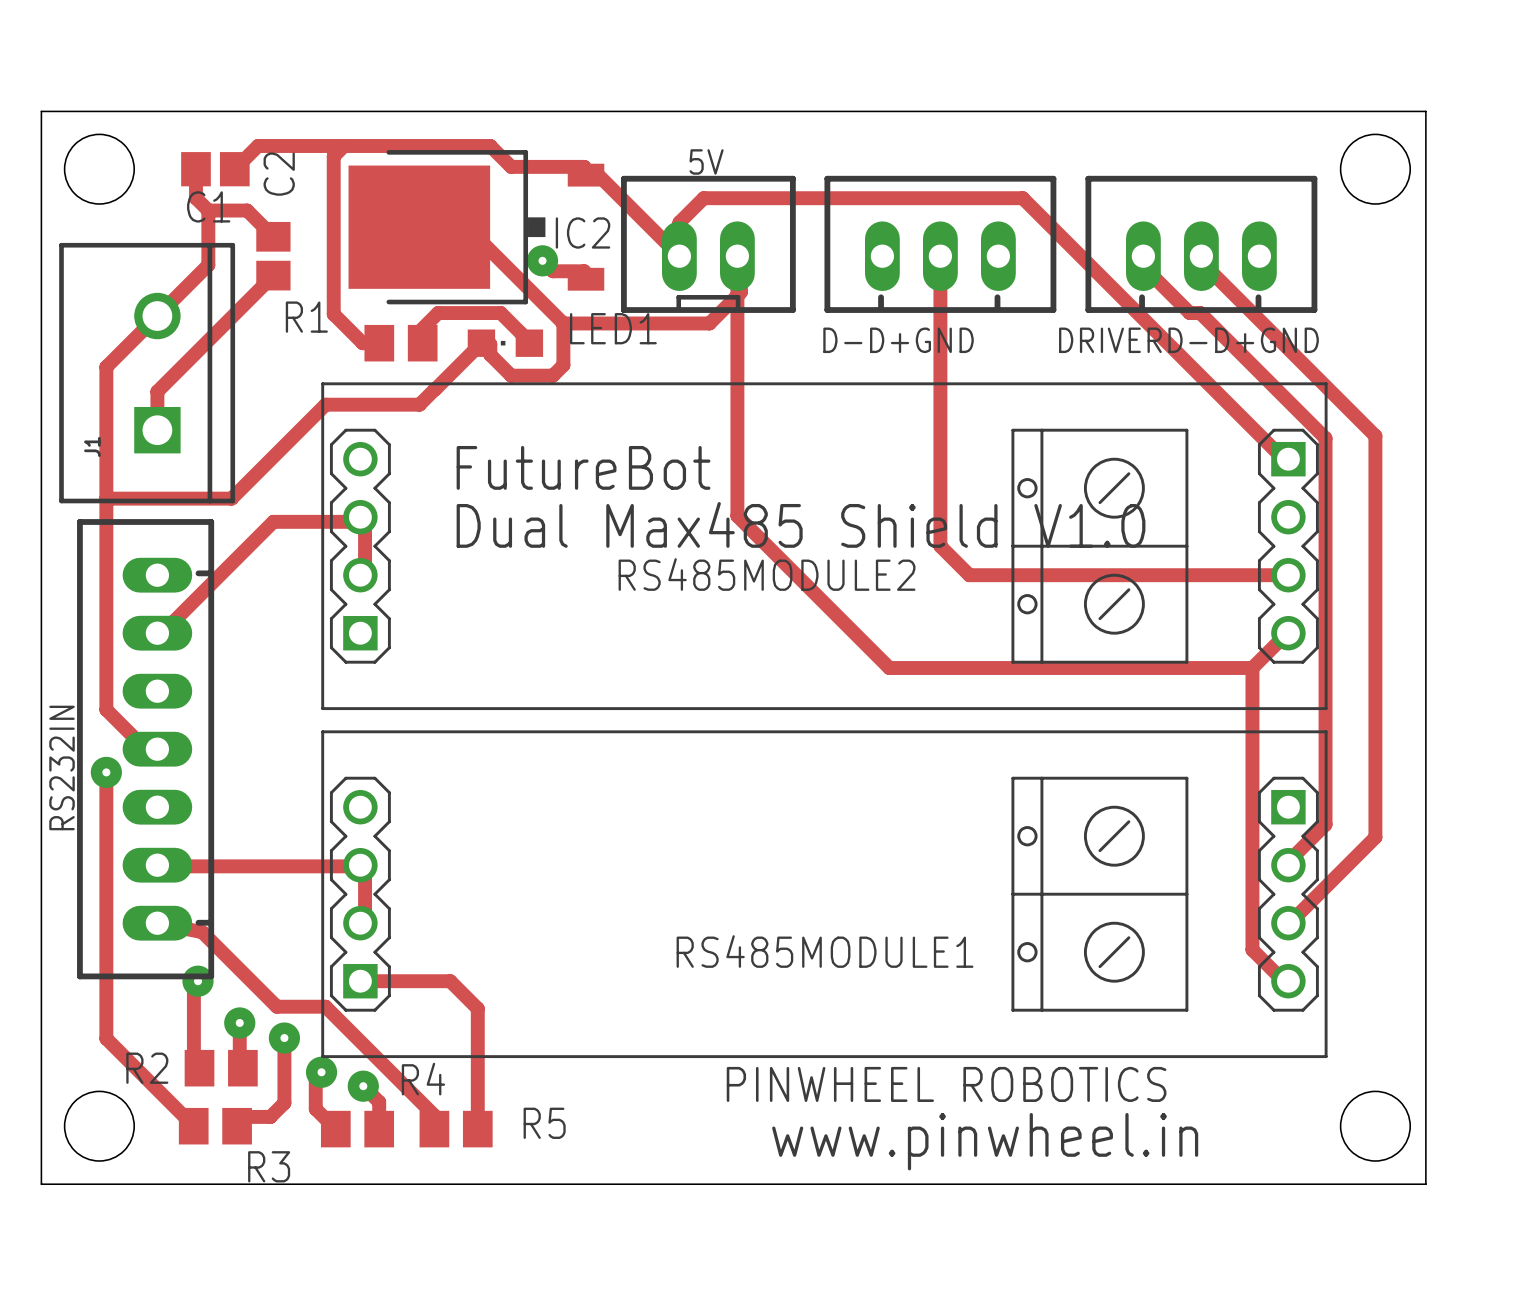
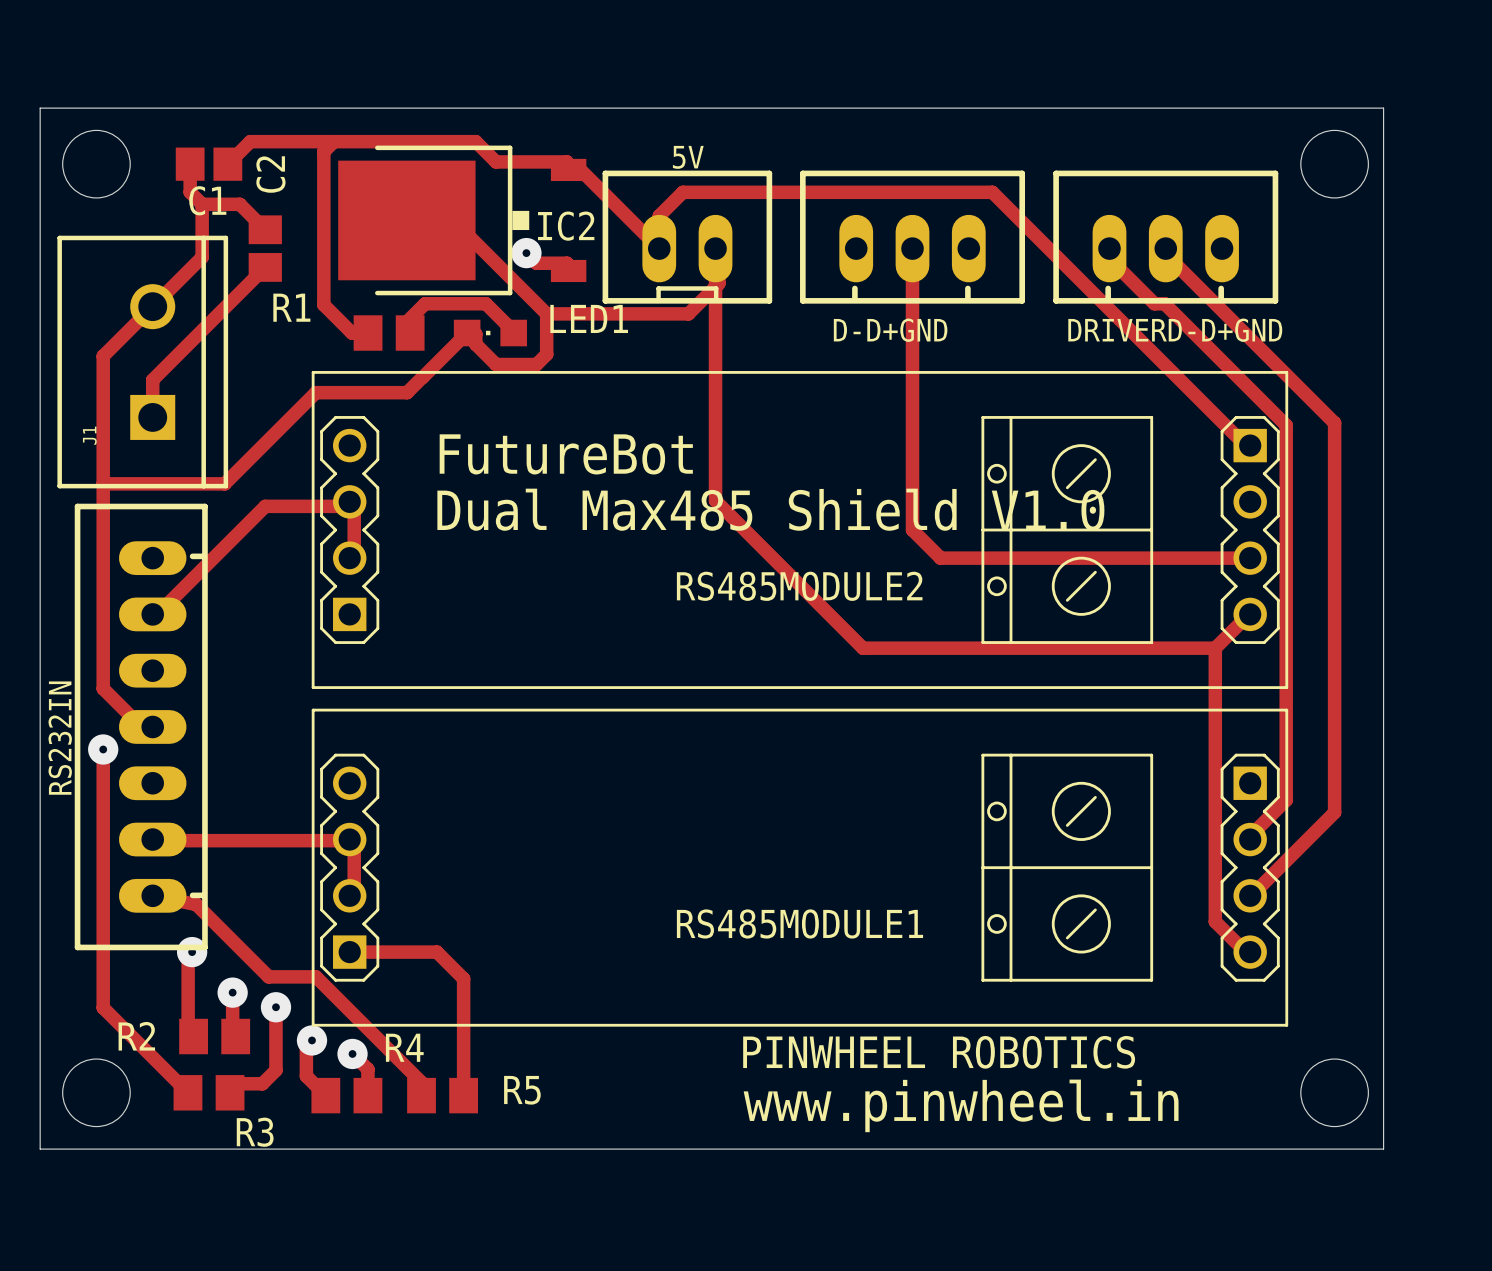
RS485MODULE2 name position: RS485MODULE2 (767, 574) -> RS485MODULE2 (799, 586)

